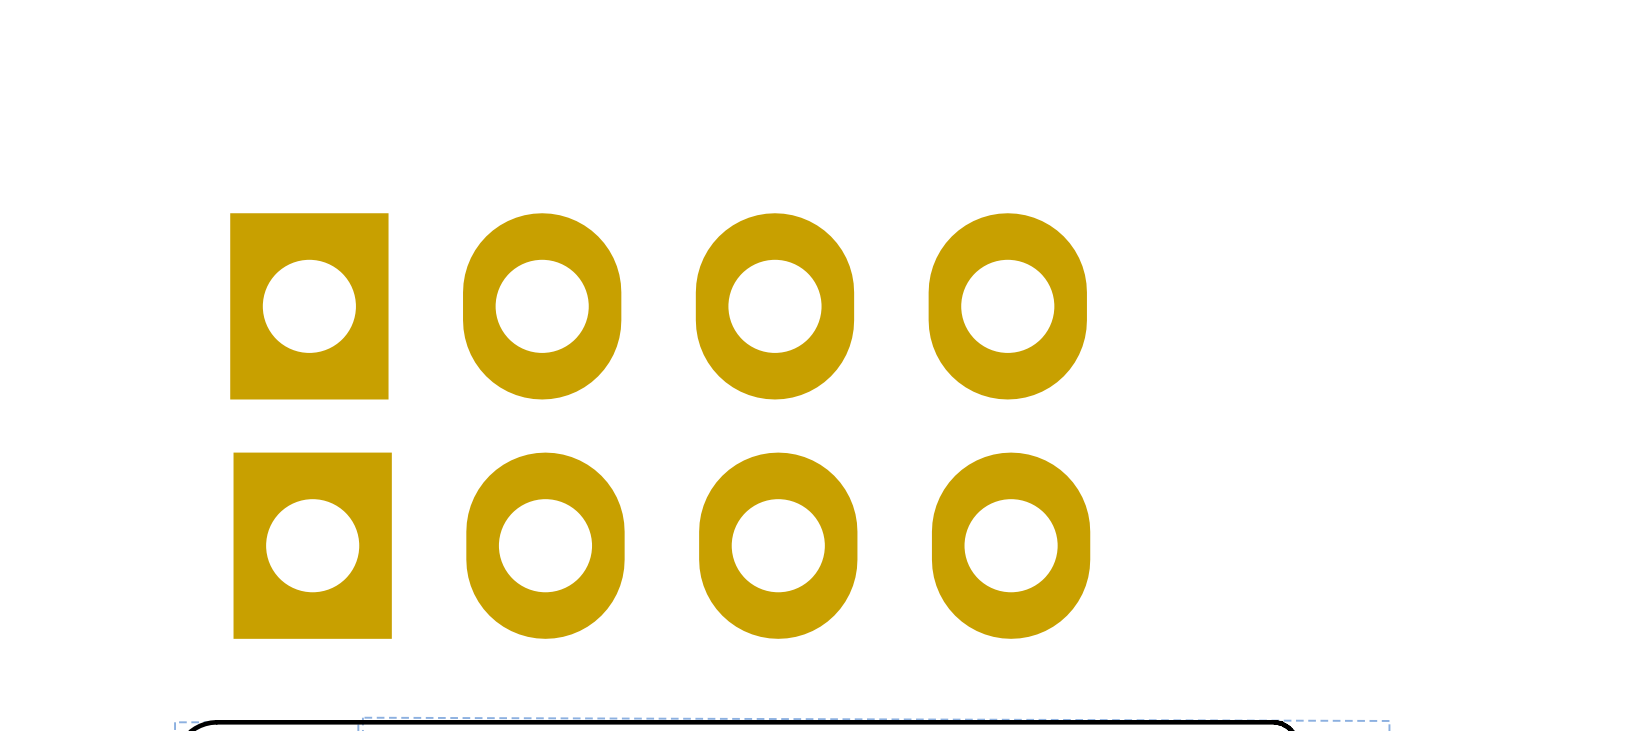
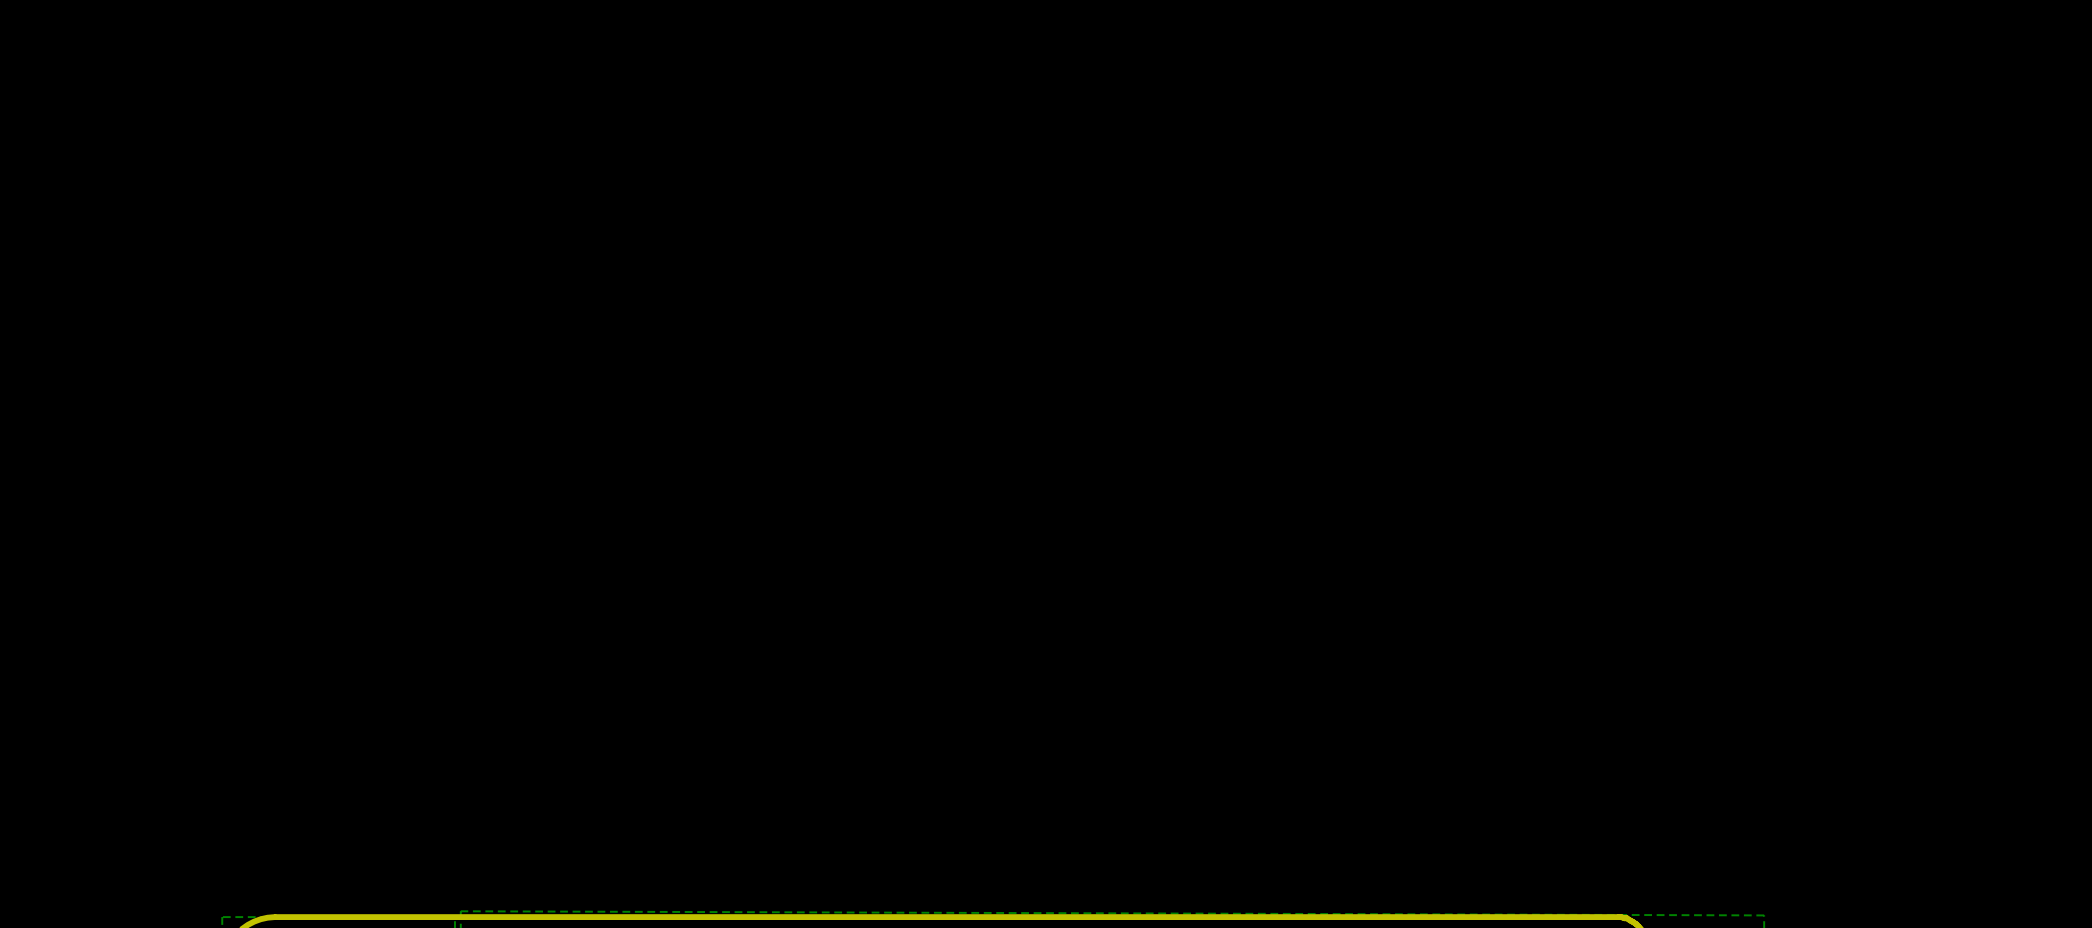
part: (658, 306) -> none
part: (661, 545) -> none

